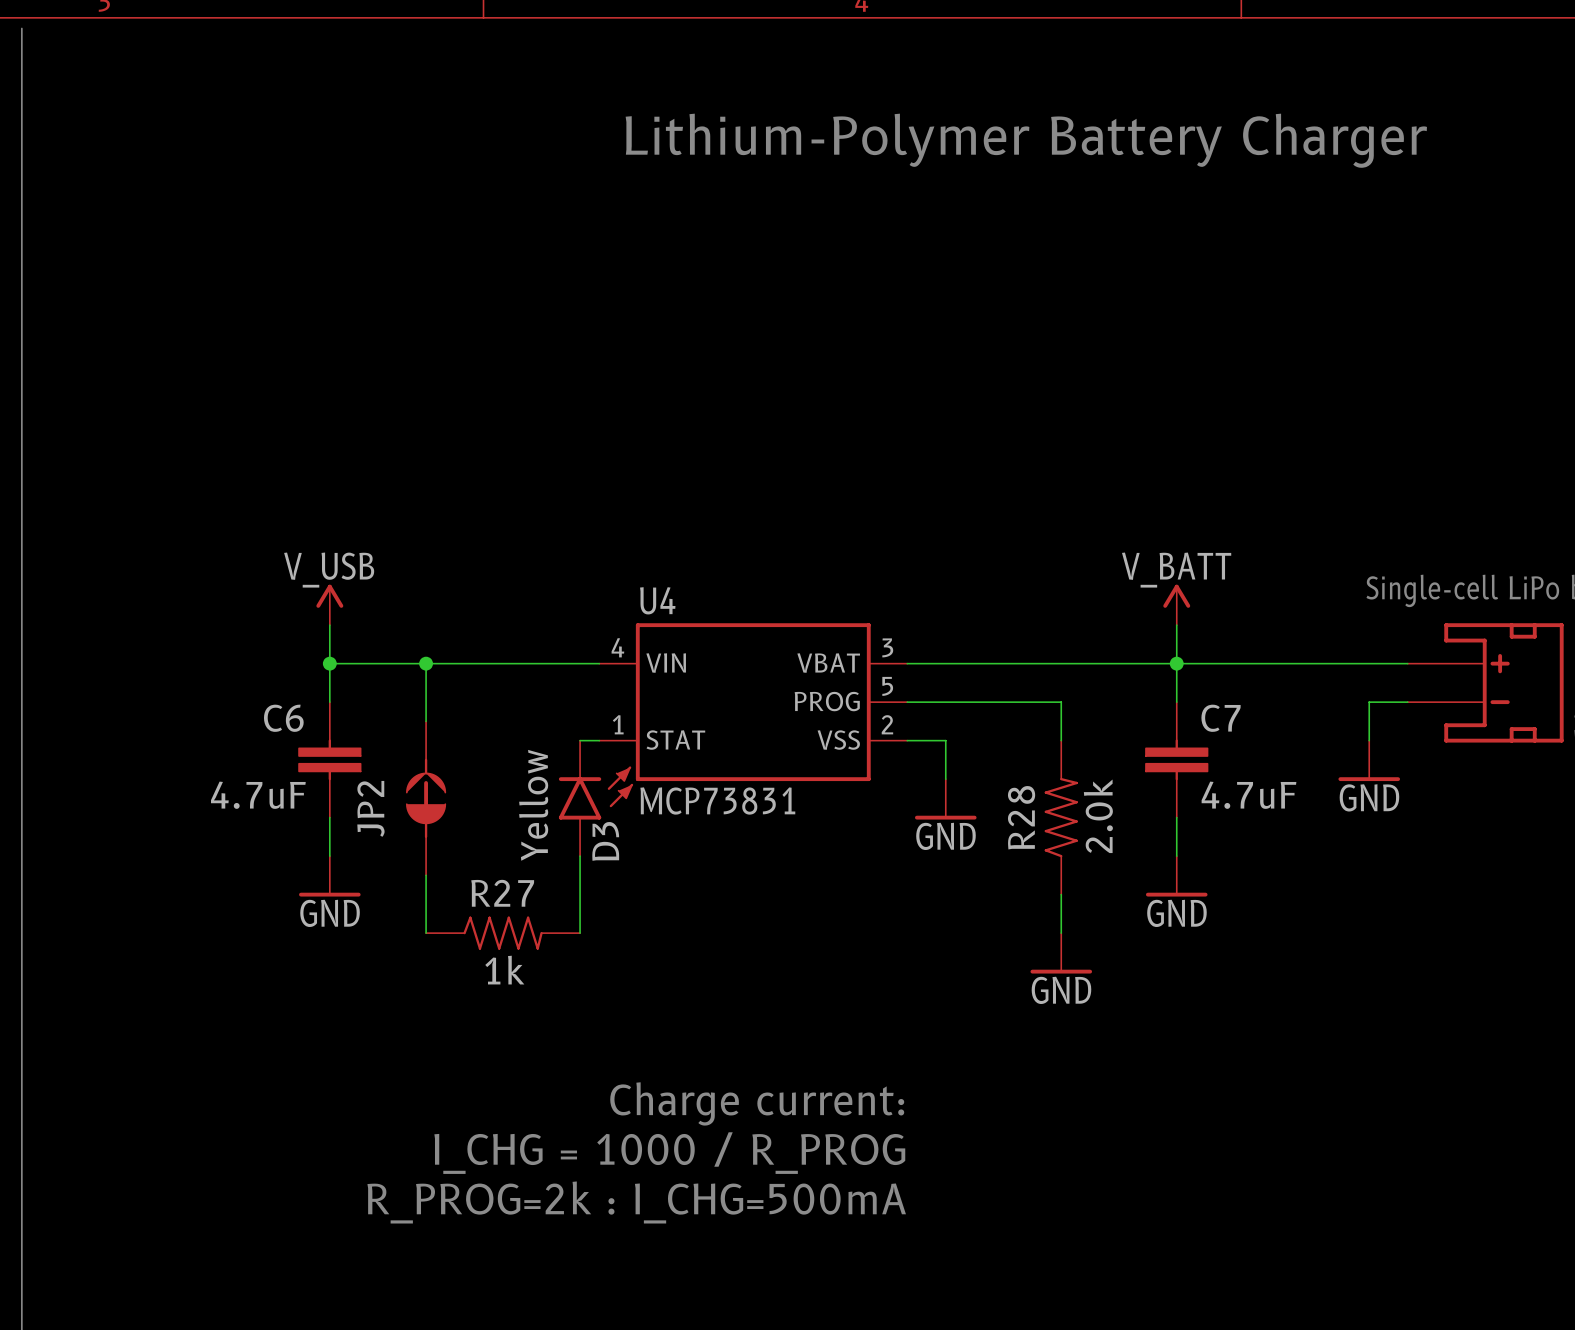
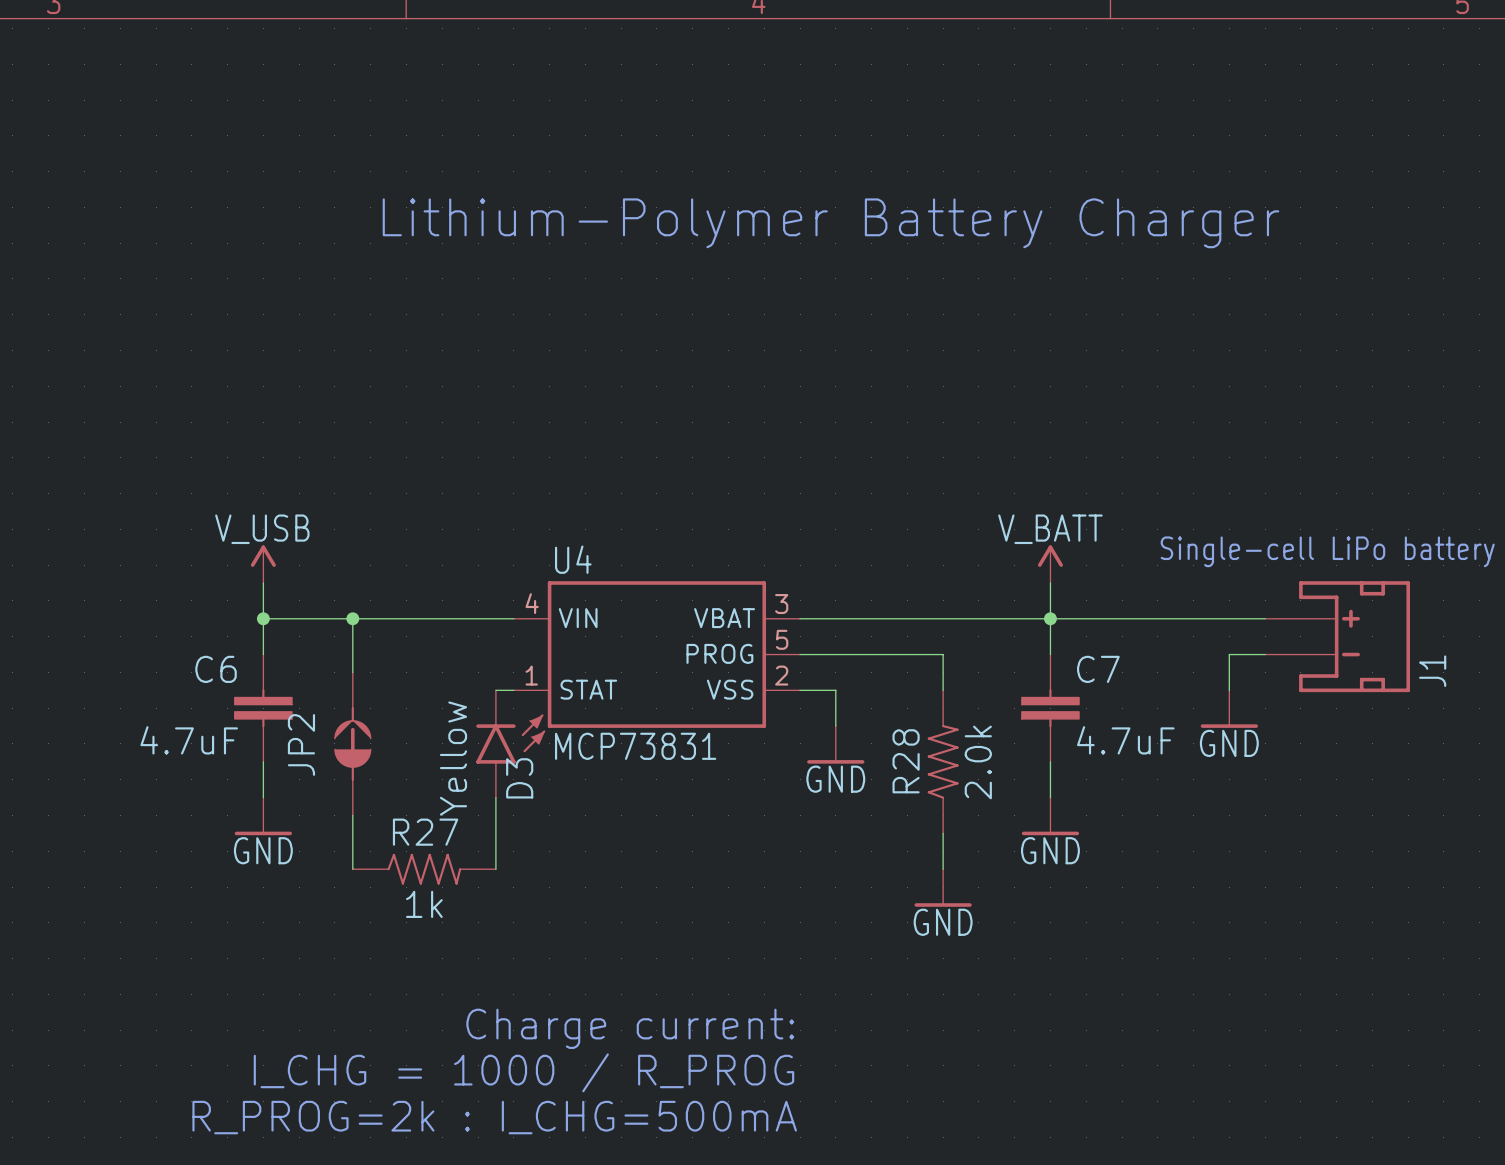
text position: Lithium-Polymer Battery Charger (1026, 140) -> Lithium-Polymer Battery Charger (830, 223)

